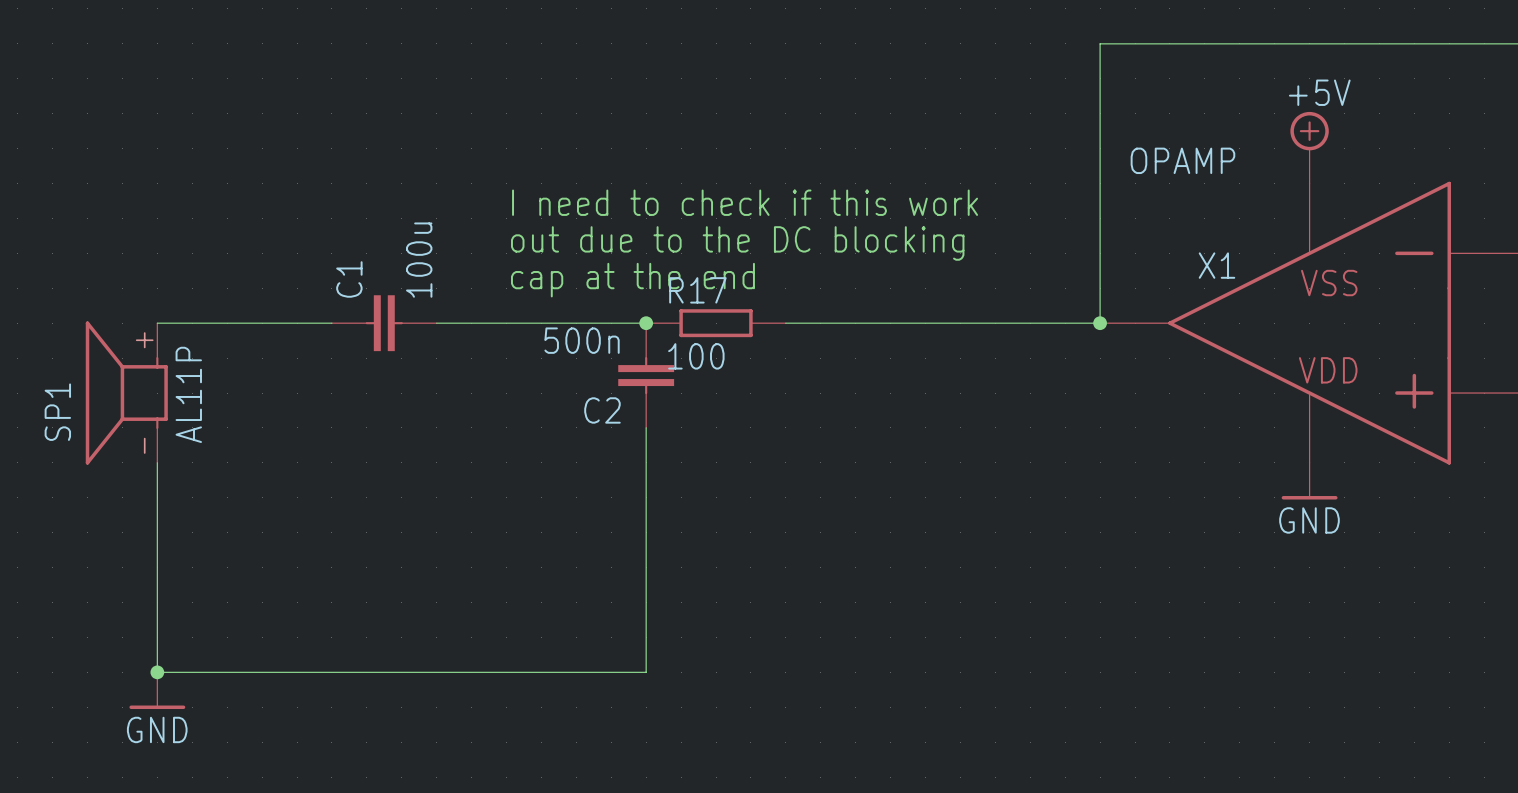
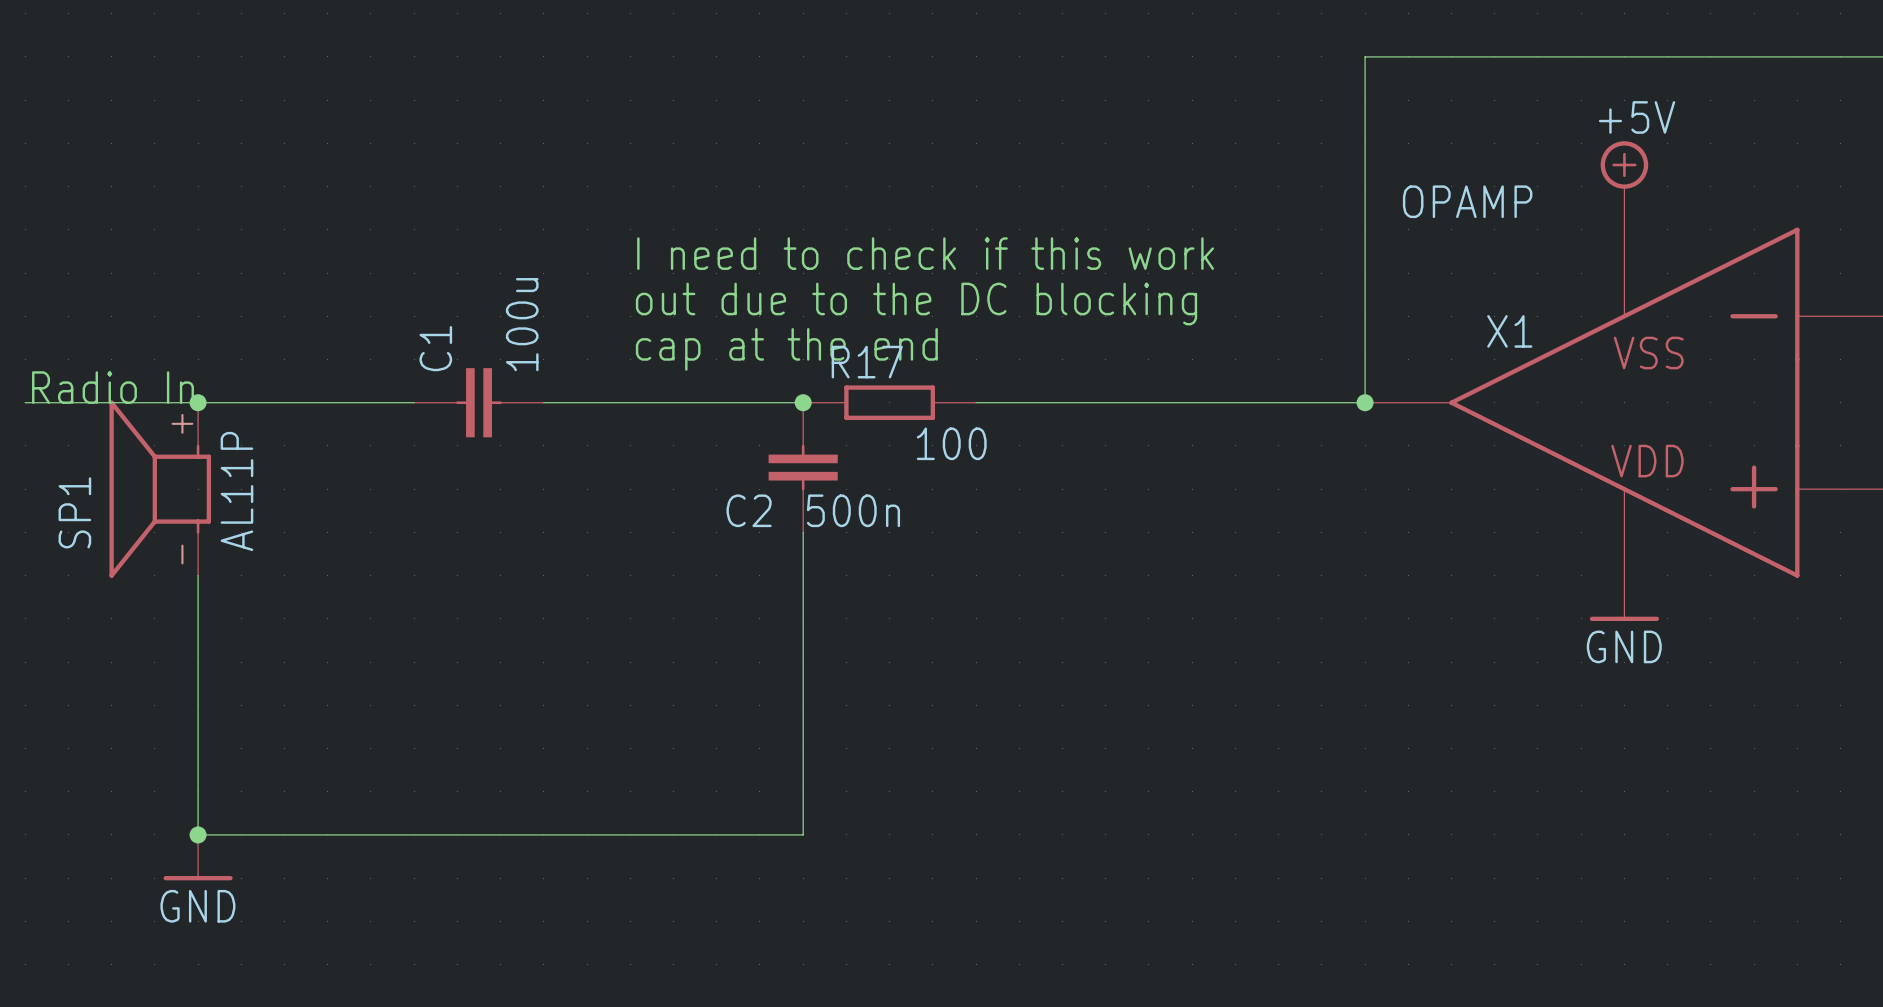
text: none -> Radio In (112, 387)
wire: none -> (25, 402) (198, 402)
junction: none -> (198, 402)
C2 value position: 500n (582, 340) -> 500n (853, 510)
R17 value position: 100 (696, 356) -> 100 (951, 443)

